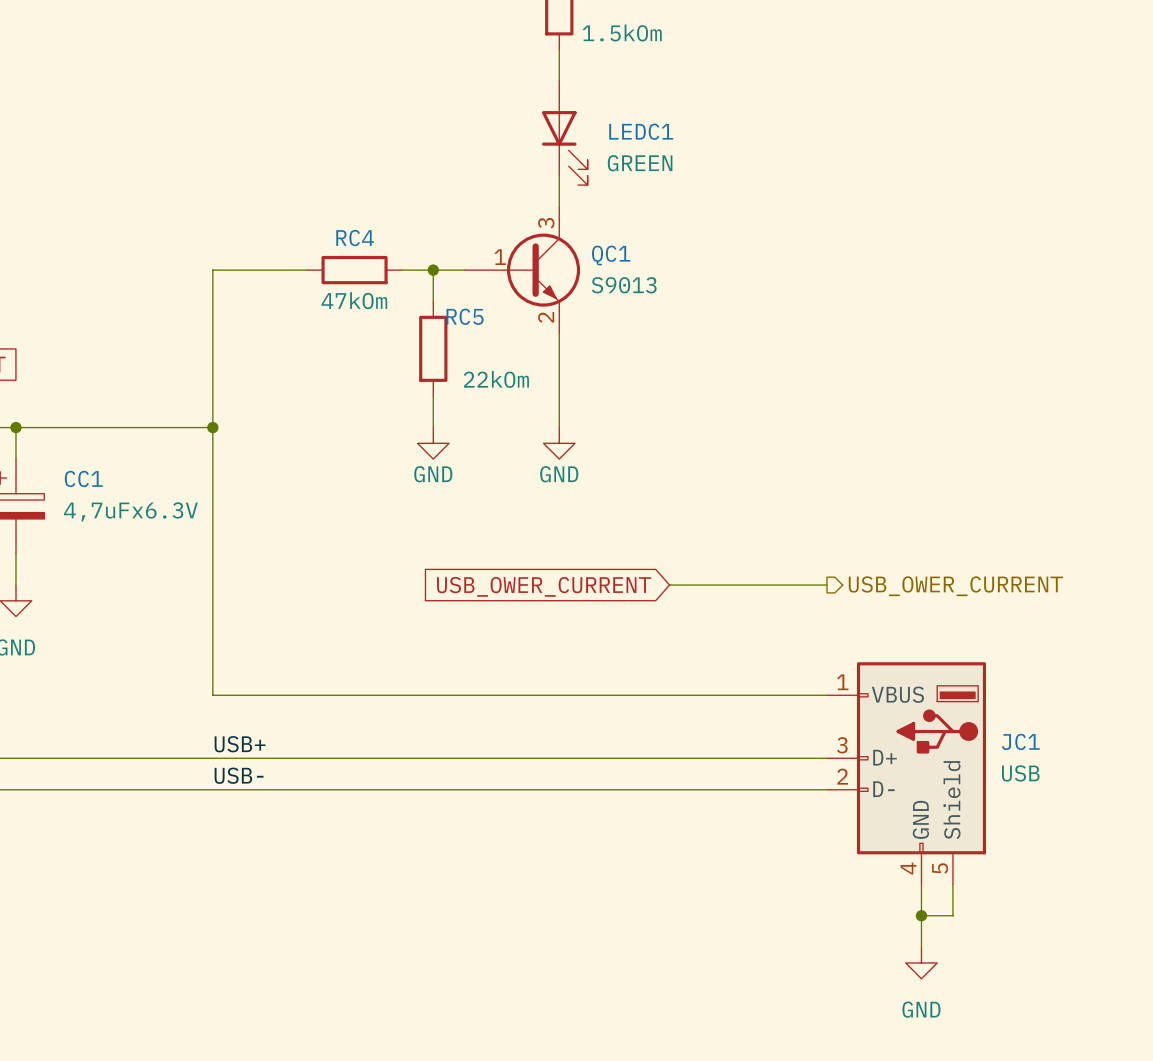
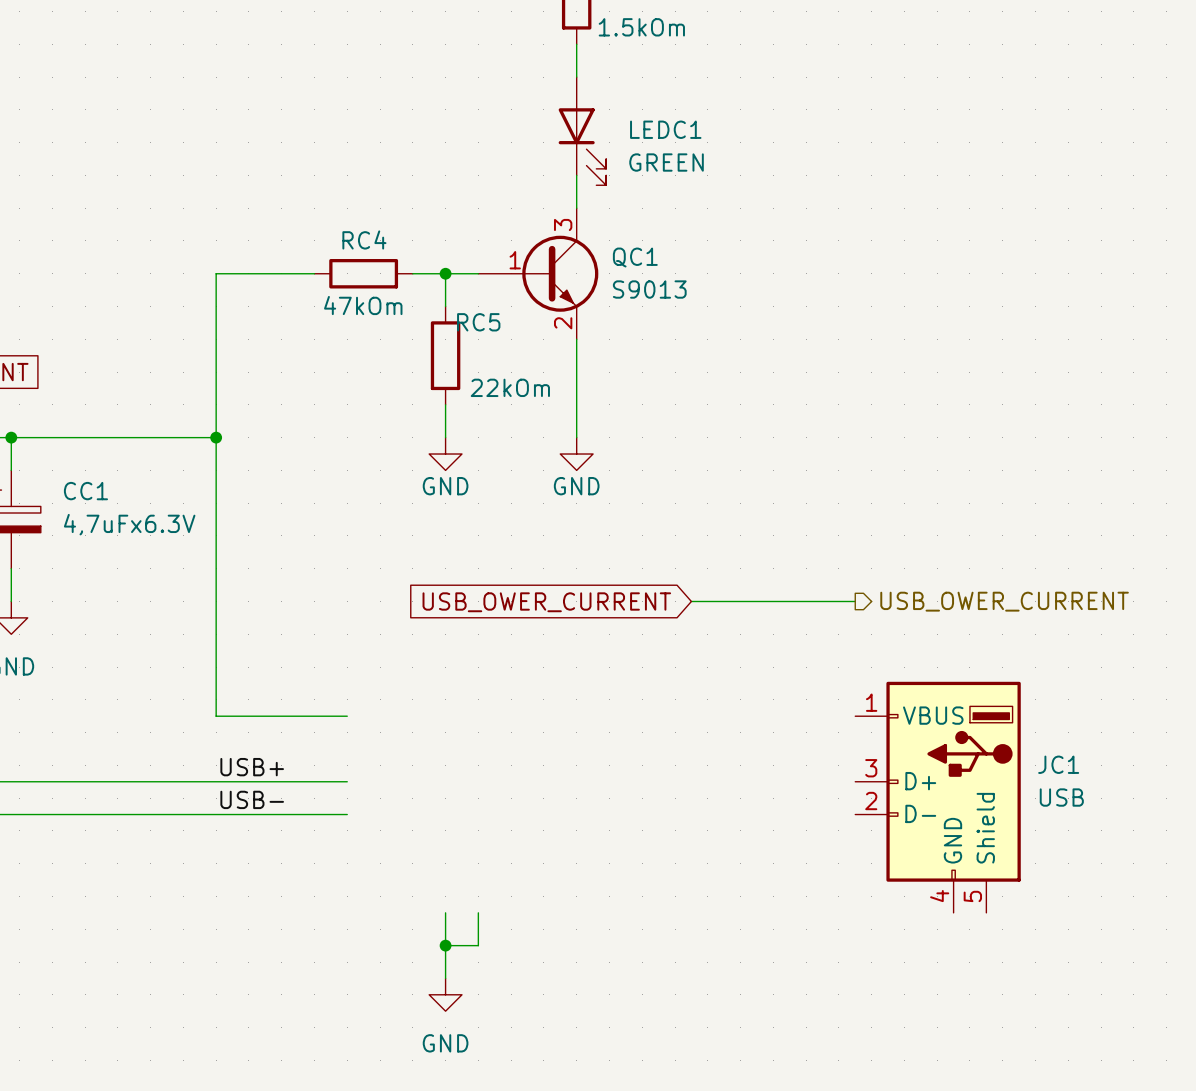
wire: (338, 695) (826, 695) -> none
wire: (338, 758) (826, 758) -> none
wire: (338, 789) (826, 789) -> none
wire: none -> (445, 912) (445, 978)
wire: none -> (478, 912) (478, 945) (445, 945)
wire: (921, 884) (921, 947) -> none
wire: (952, 884) (952, 915) (921, 915) -> none
junction: none -> (445, 945)
junction: (921, 915) -> none
power symbol: none -> GND (445, 994)
power symbol: GND (921, 962) -> none

